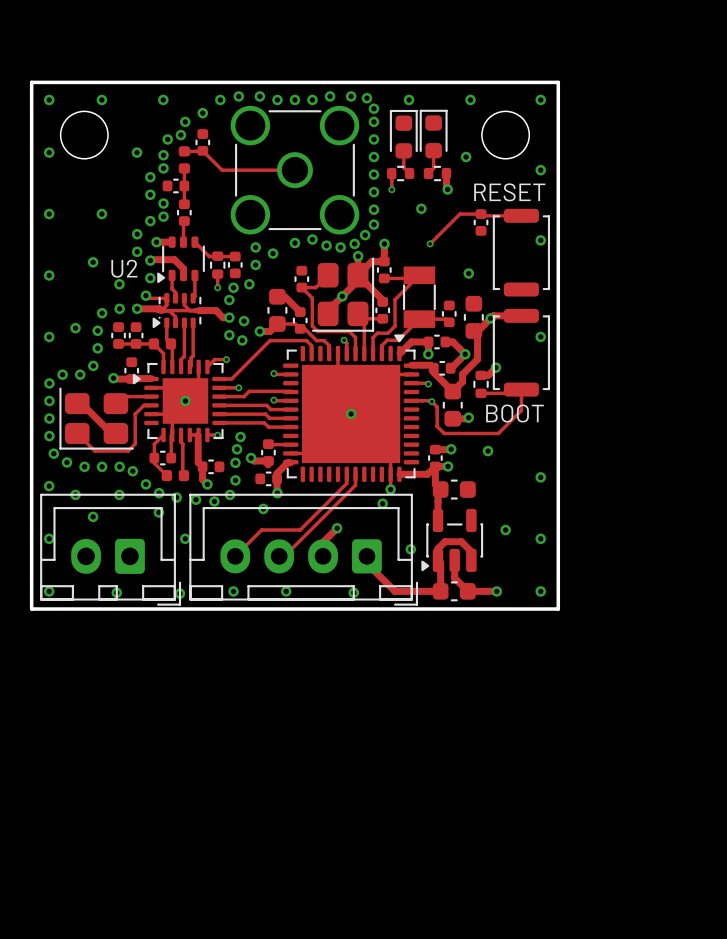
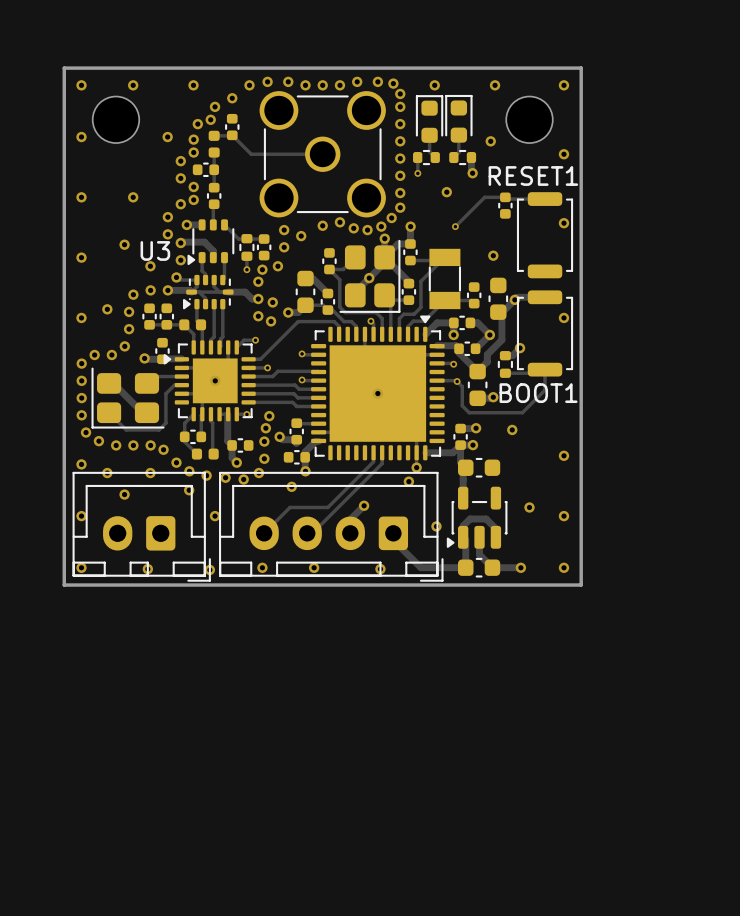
RESET name: RESET (509, 192) -> RESET1 (533, 176)
U2 name: U2 (124, 268) -> U3 (155, 250)
BOOT name: BOOT (515, 413) -> BOOT1 (538, 393)

